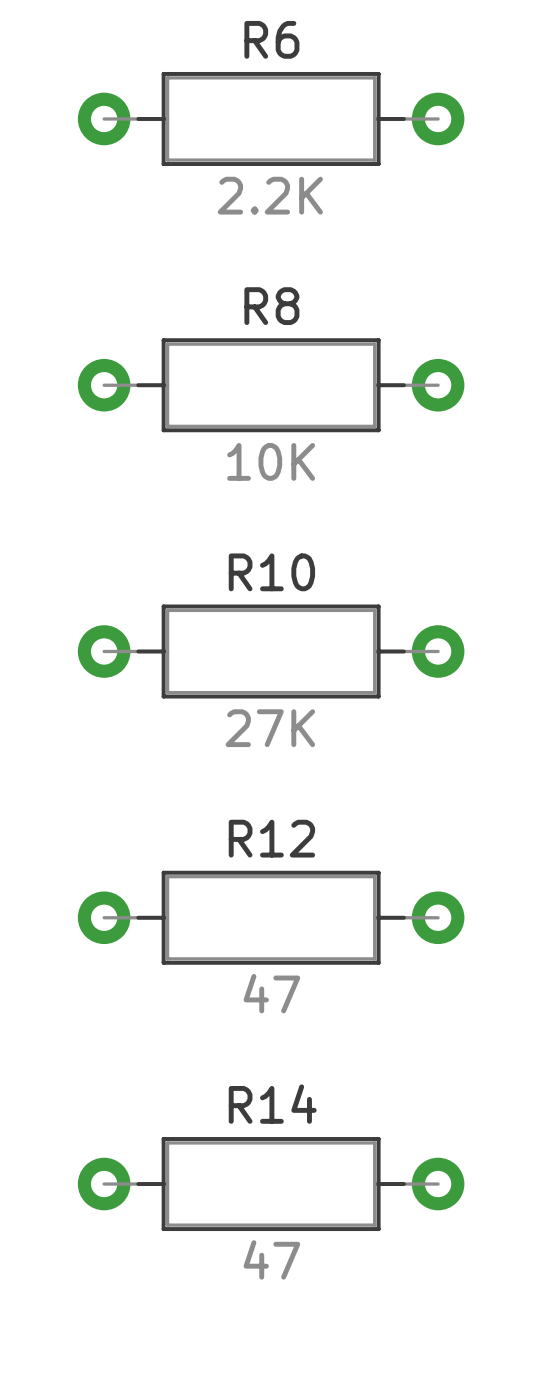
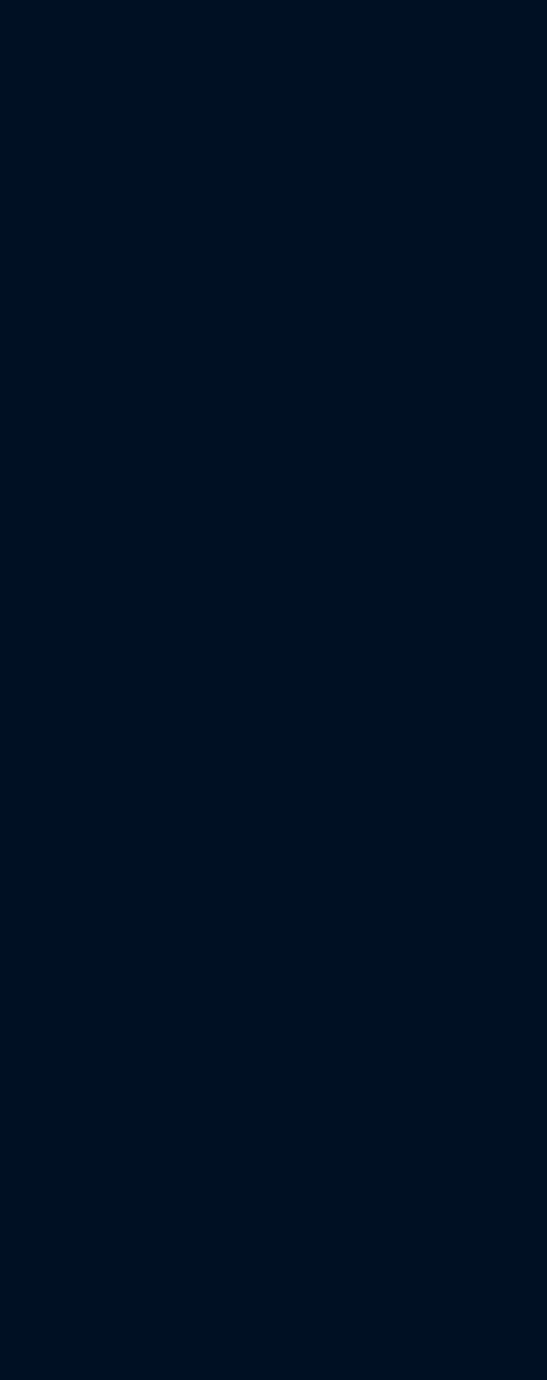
R6: 2.2K (271, 118) -> none
R8: 10K (271, 385) -> none
R10: 27K (271, 651) -> none
R12: 47 (271, 917) -> none
R14: 47 (271, 1184) -> none

